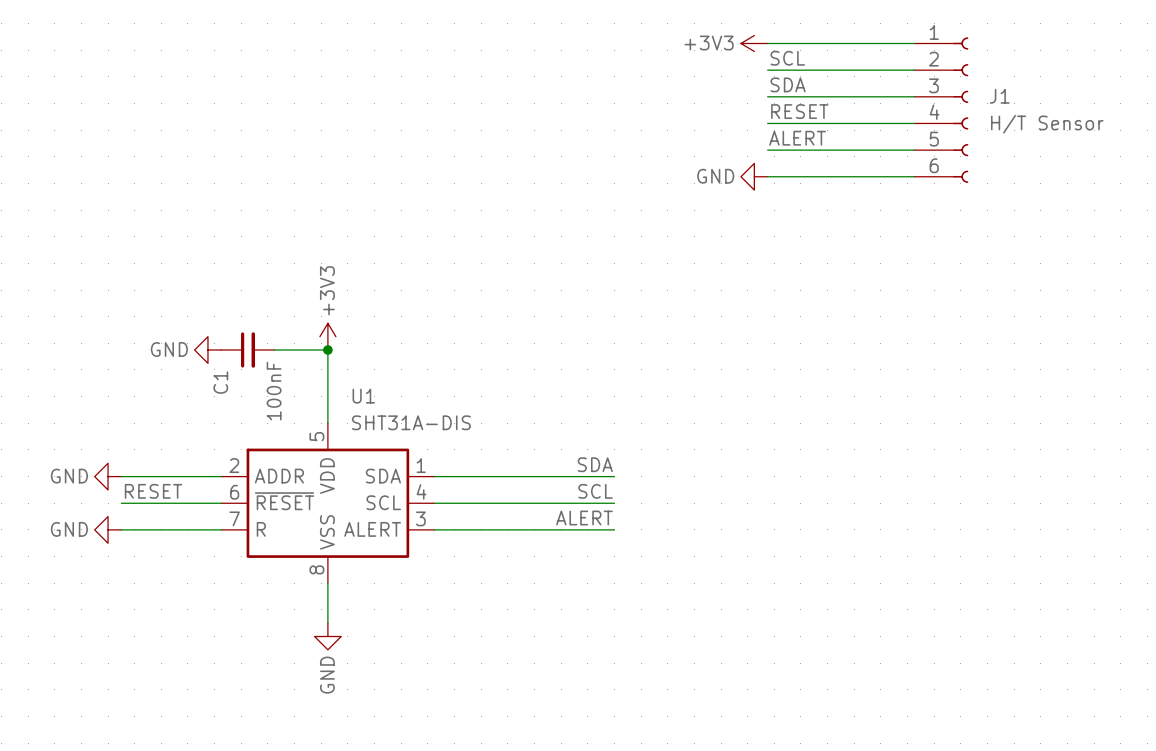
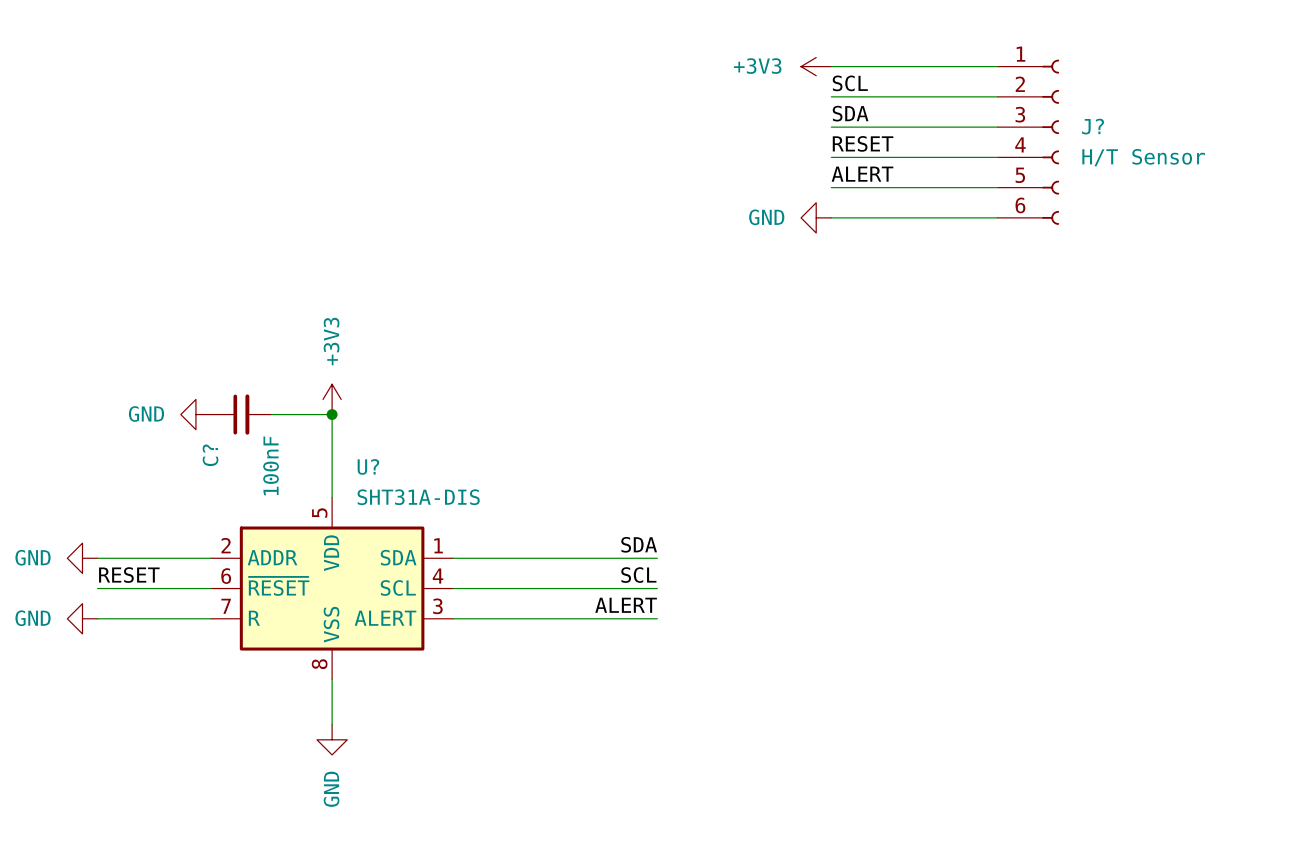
J1 name: J1 (999, 96) -> J? (1093, 126)
C1 name: C1 (220, 382) -> C? (210, 455)
U1 name: U1 (363, 396) -> U? (368, 466)

